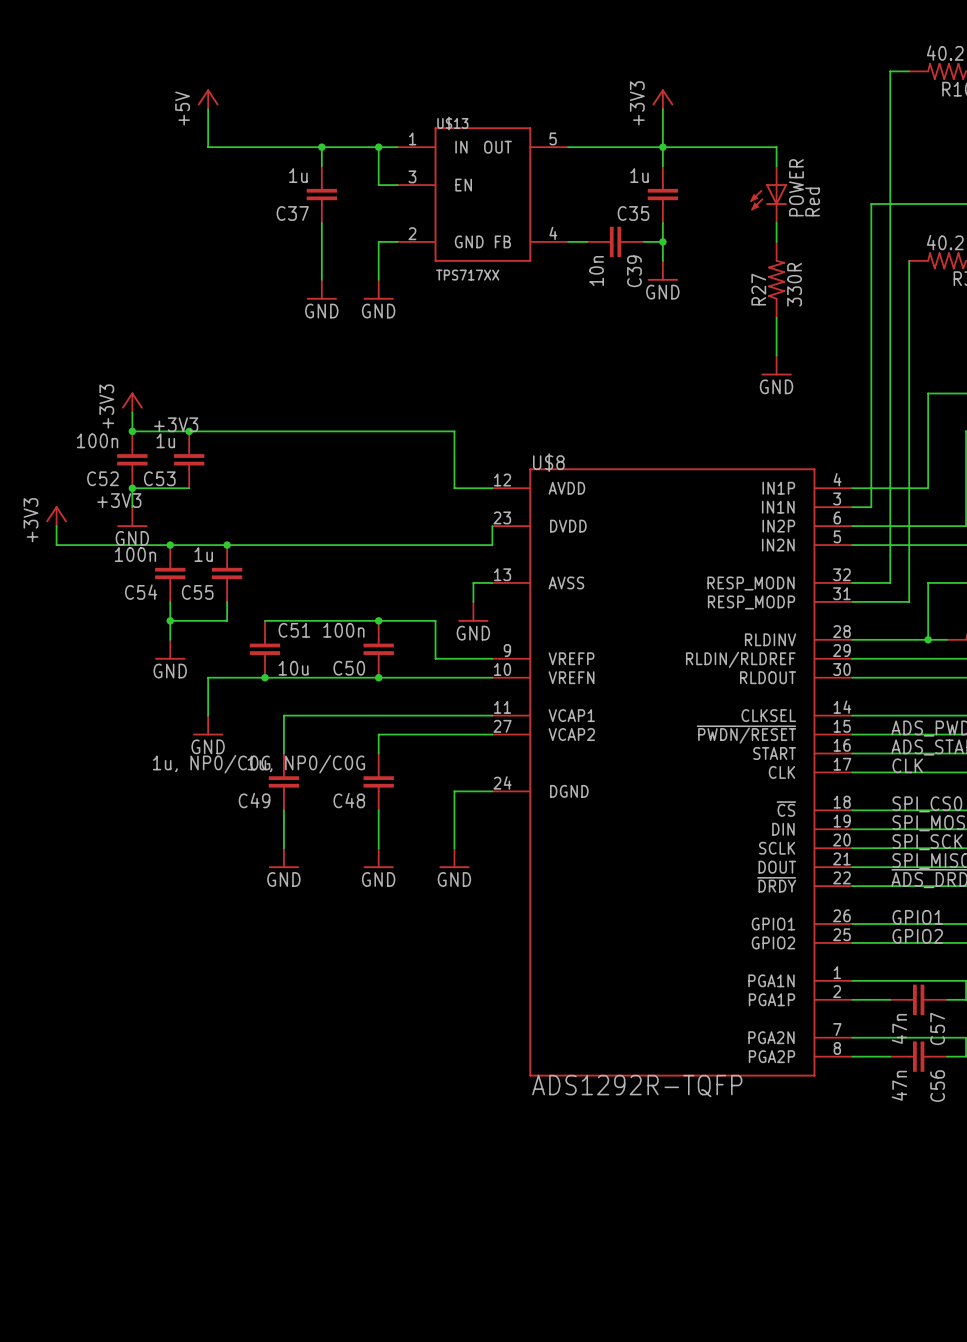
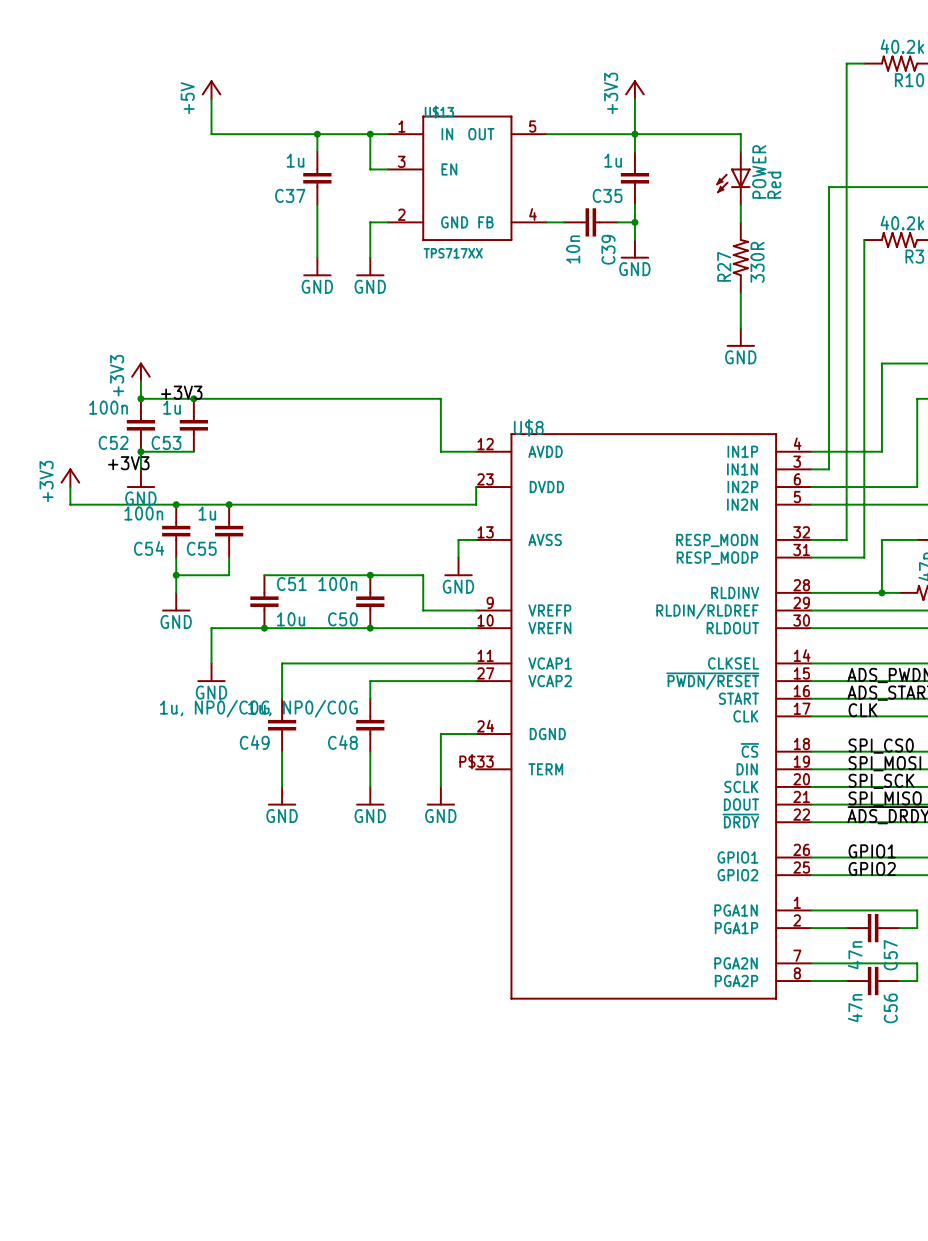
U$8 symbol: [492, 468, 853, 1077] -> [476, 433, 812, 1000]
U$8 value: ADS1292R-TQFP (637, 1085) -> none

